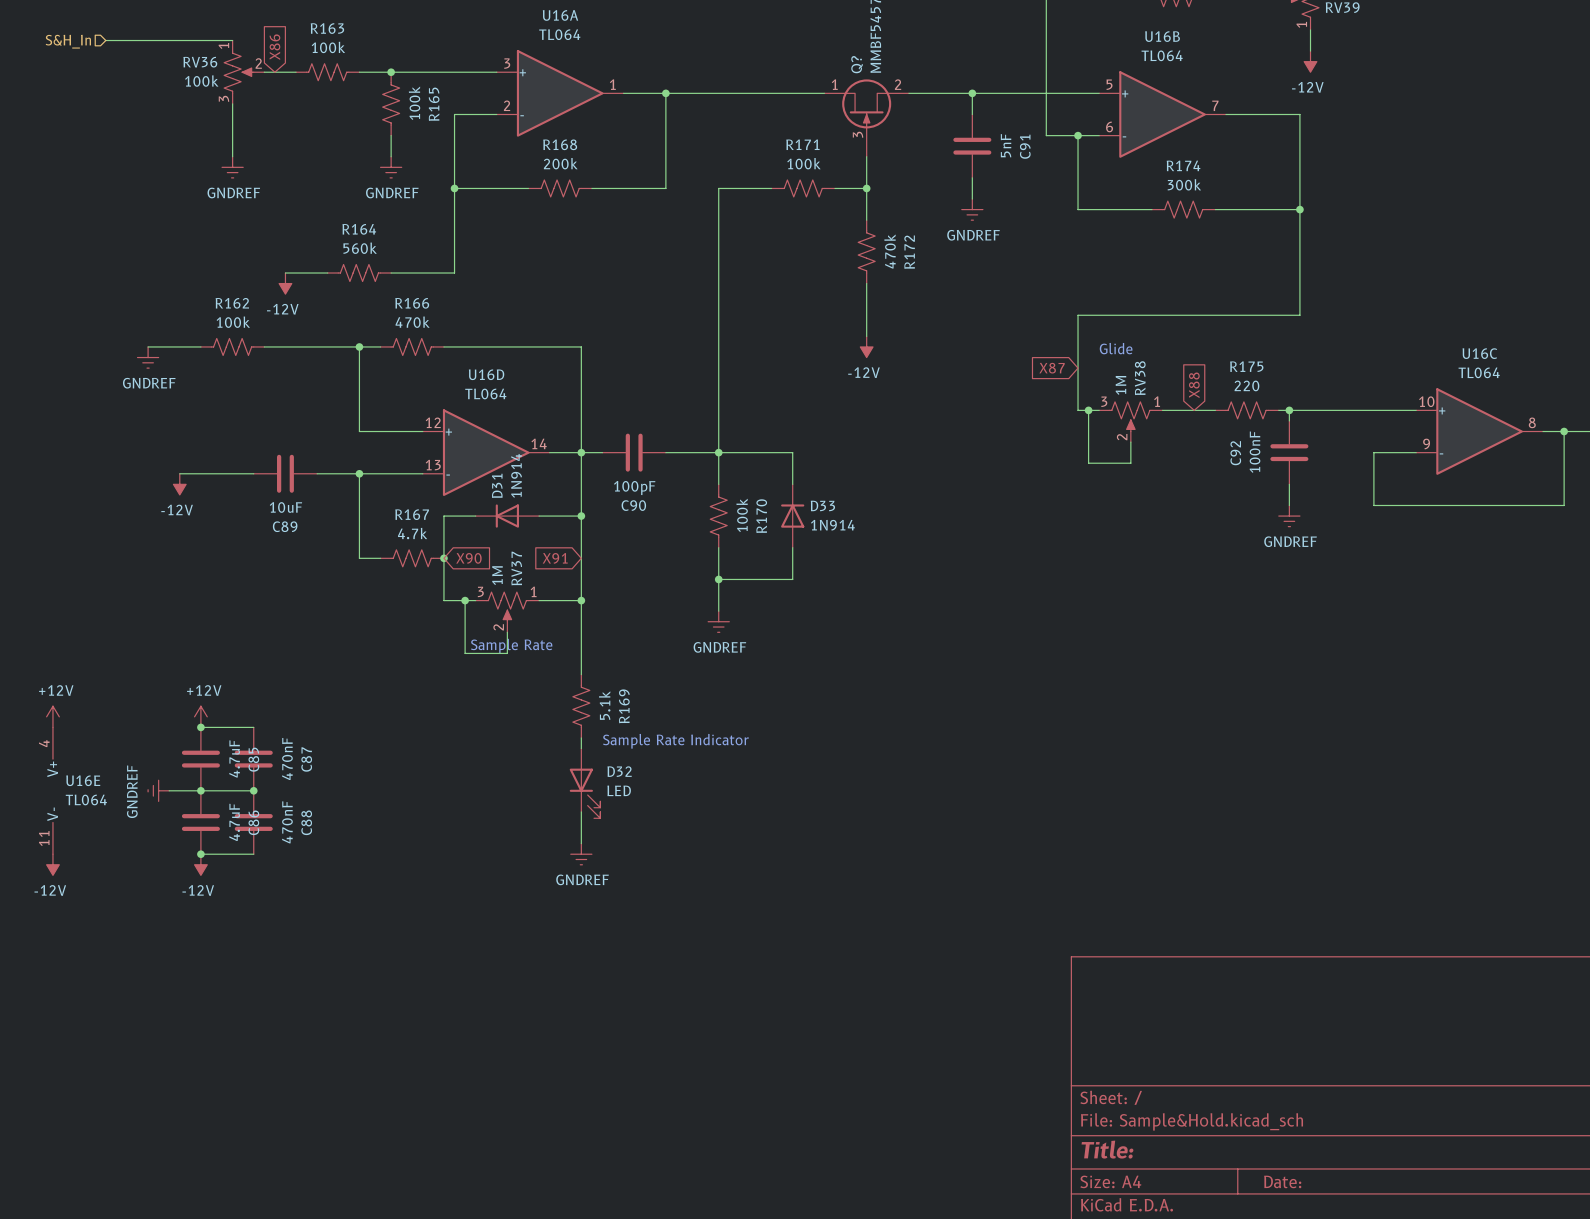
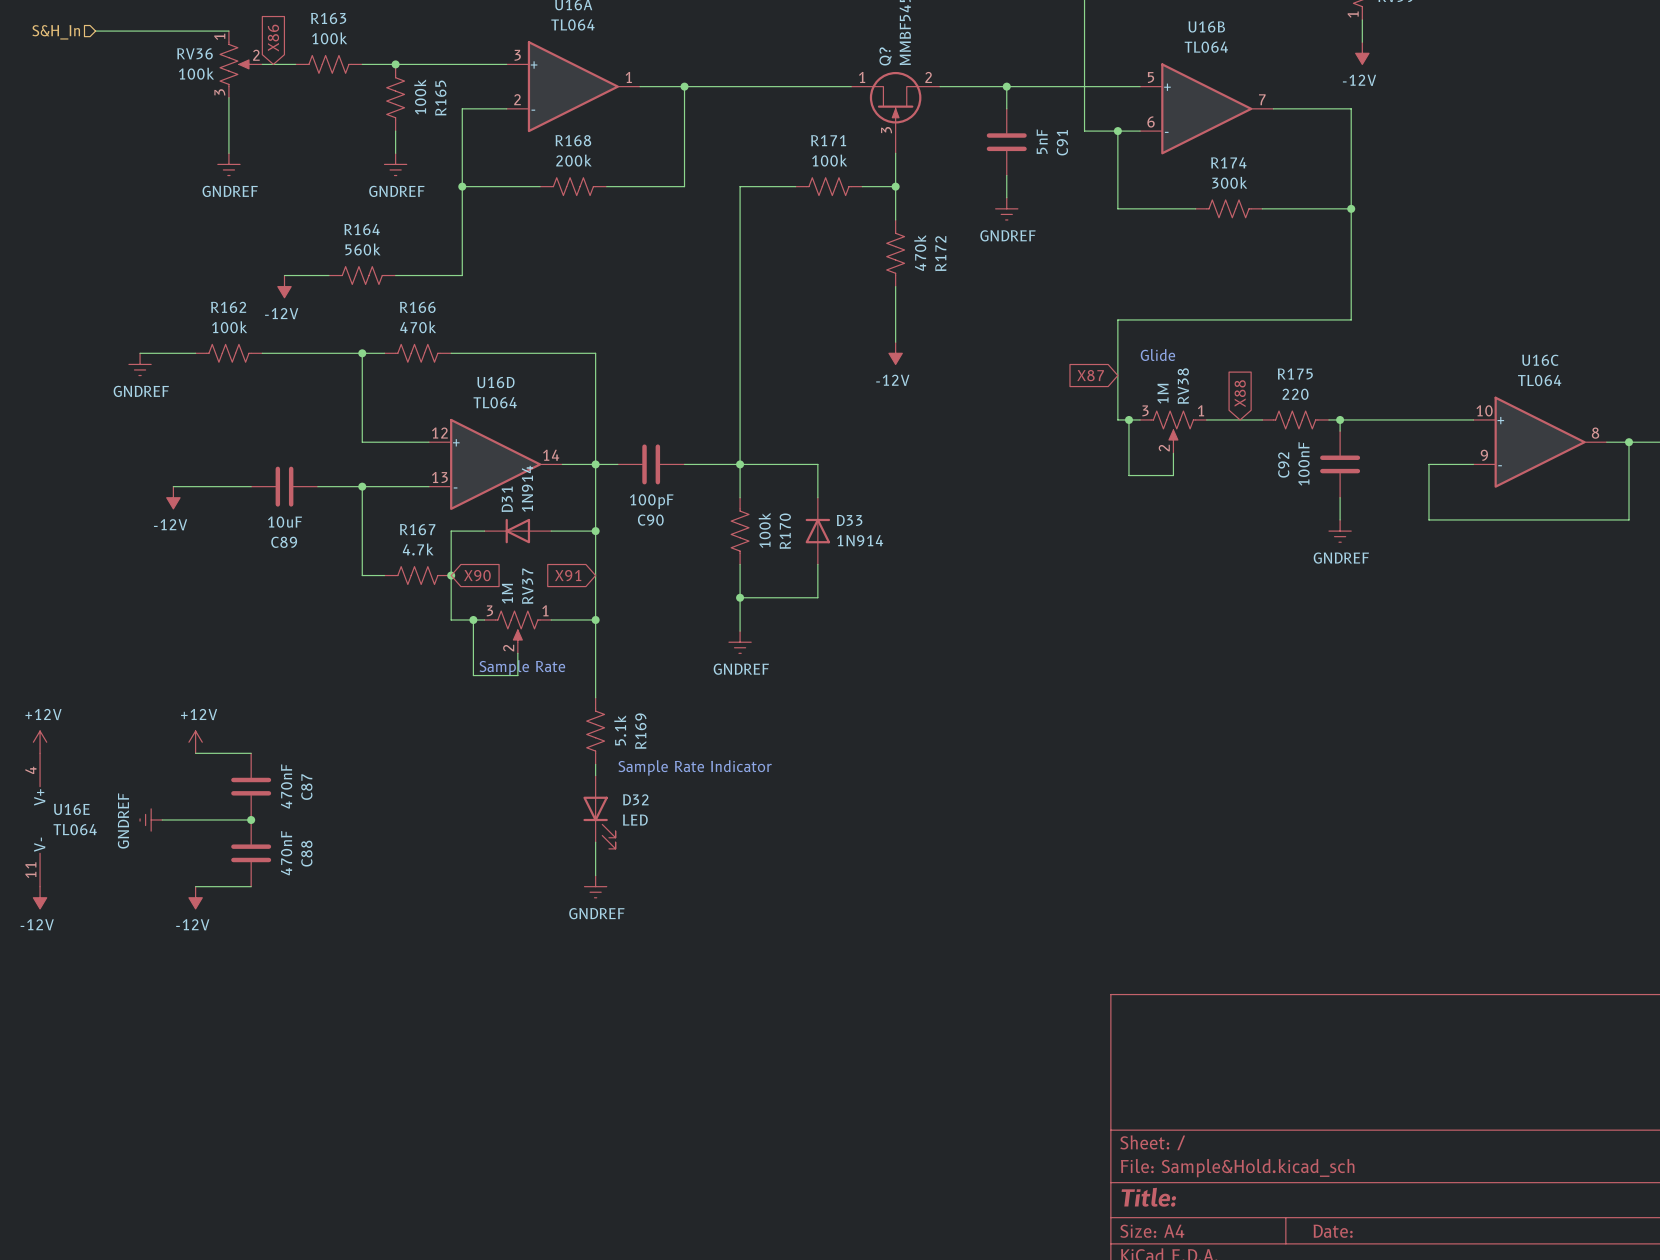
junction: (200, 727) -> none
C85: 4.7uF (200, 759) -> none
junction: (200, 790) -> none
C86: 4.7uF (200, 822) -> none
junction: (200, 854) -> none

